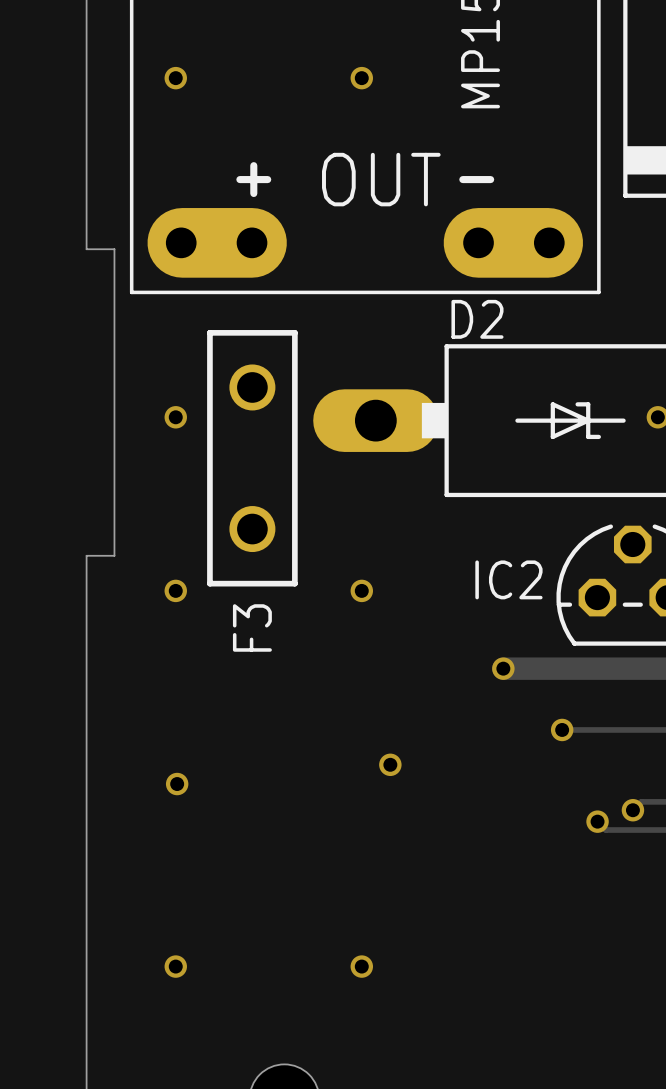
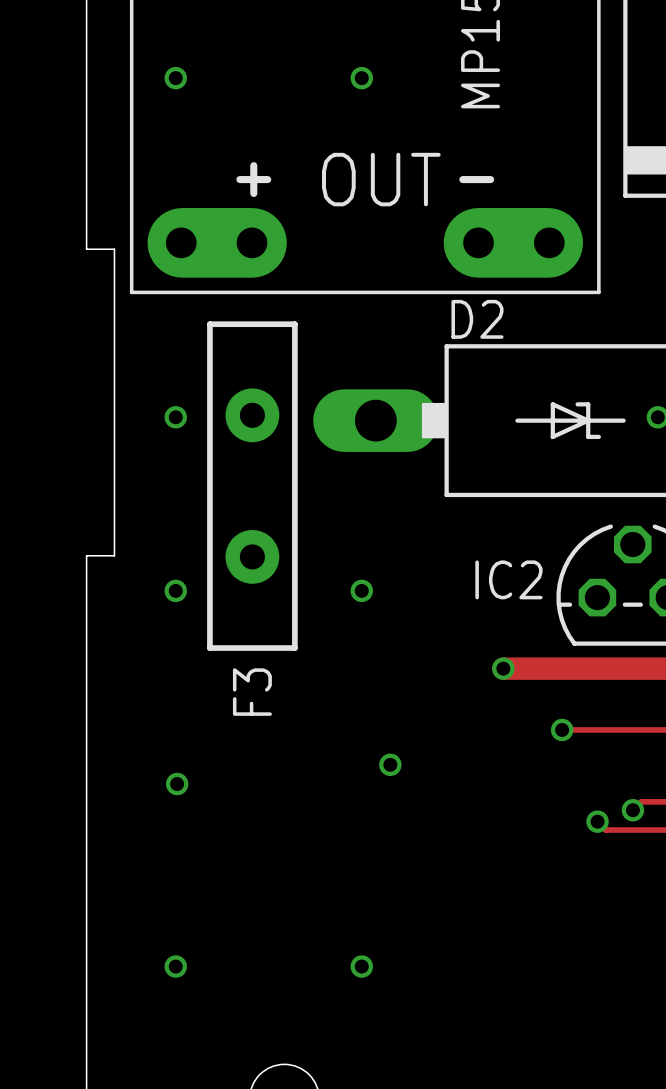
F3 footprint: [207, 330, 298, 587] -> [207, 321, 298, 651]

